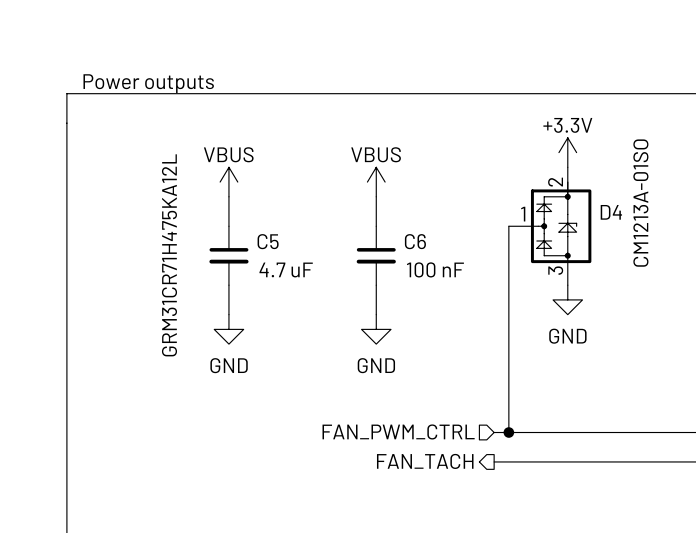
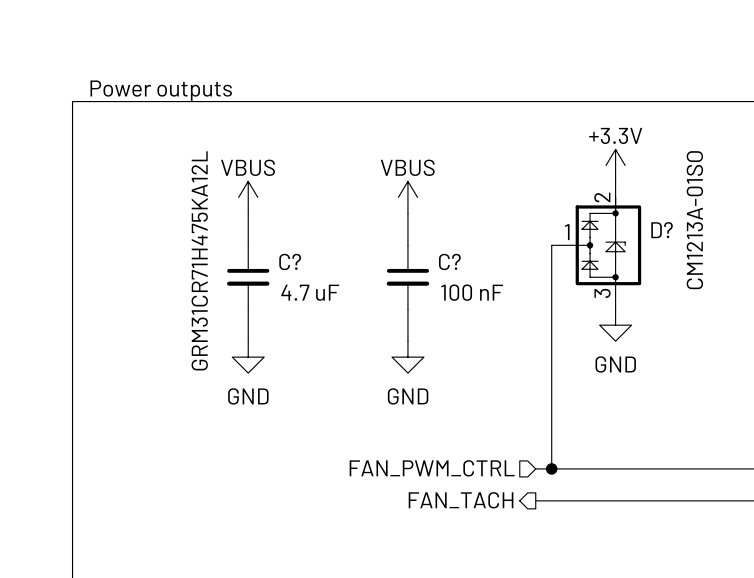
D4 name: D4 (611, 212) -> D? (662, 230)
C5 text: none -> GRM31CR71H475KA12L (199, 260)
C5 name: C5 (268, 241) -> C? (290, 261)
C6 name: C6 (415, 241) -> C? (449, 261)
C5 text: GRM31CR71H475KA12L (169, 255) -> none

